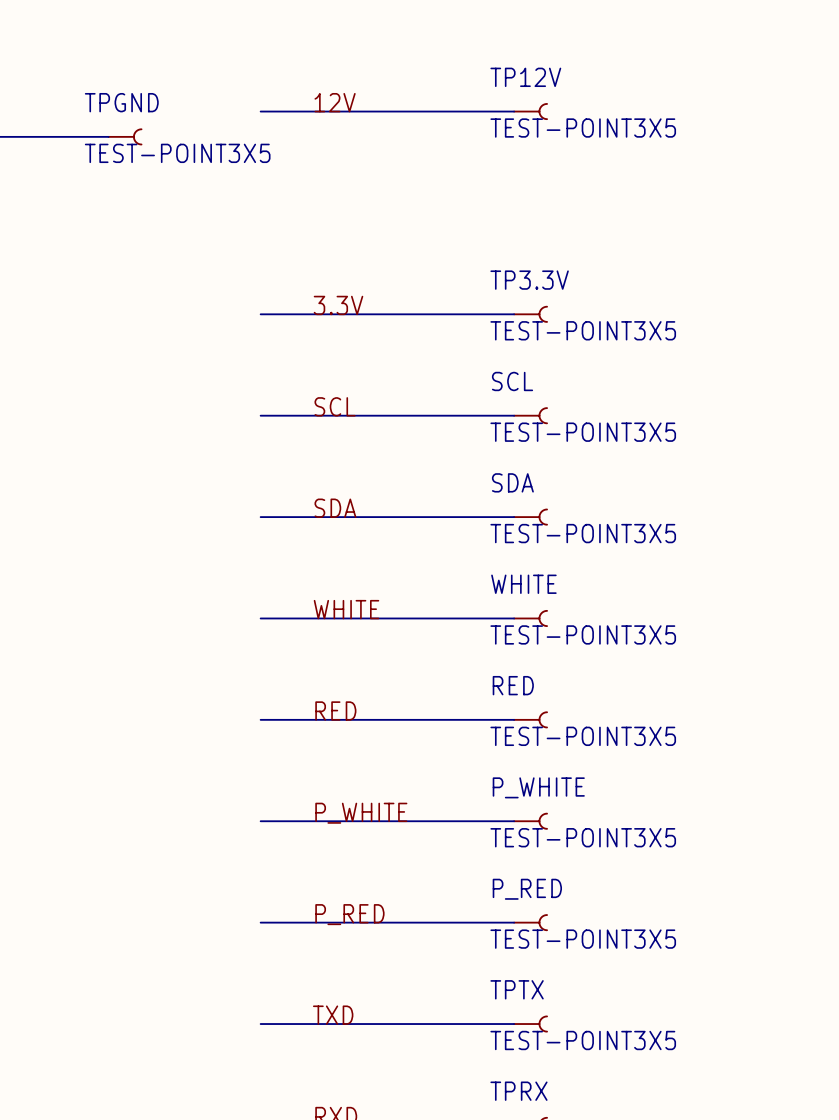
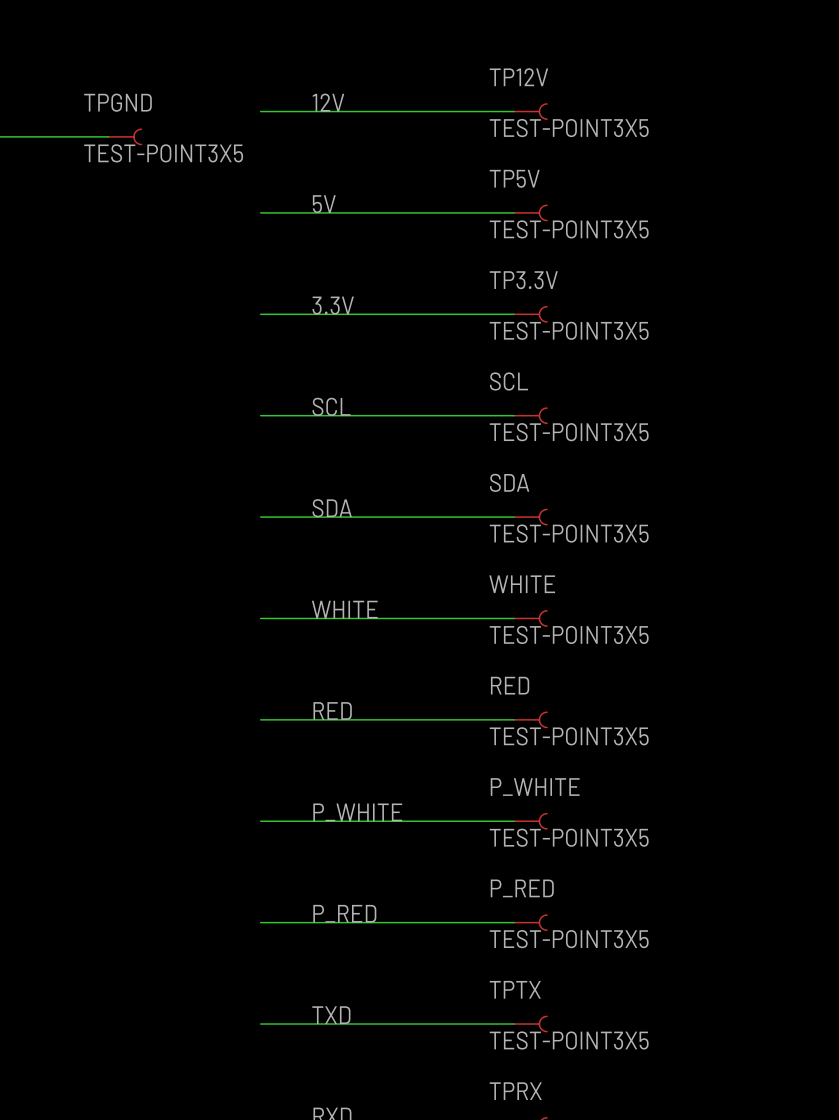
label: none -> 5V (324, 204)
wire: none -> (260, 212) (514, 212)
TP5V: none -> TEST-POINT3X5 (530, 212)

